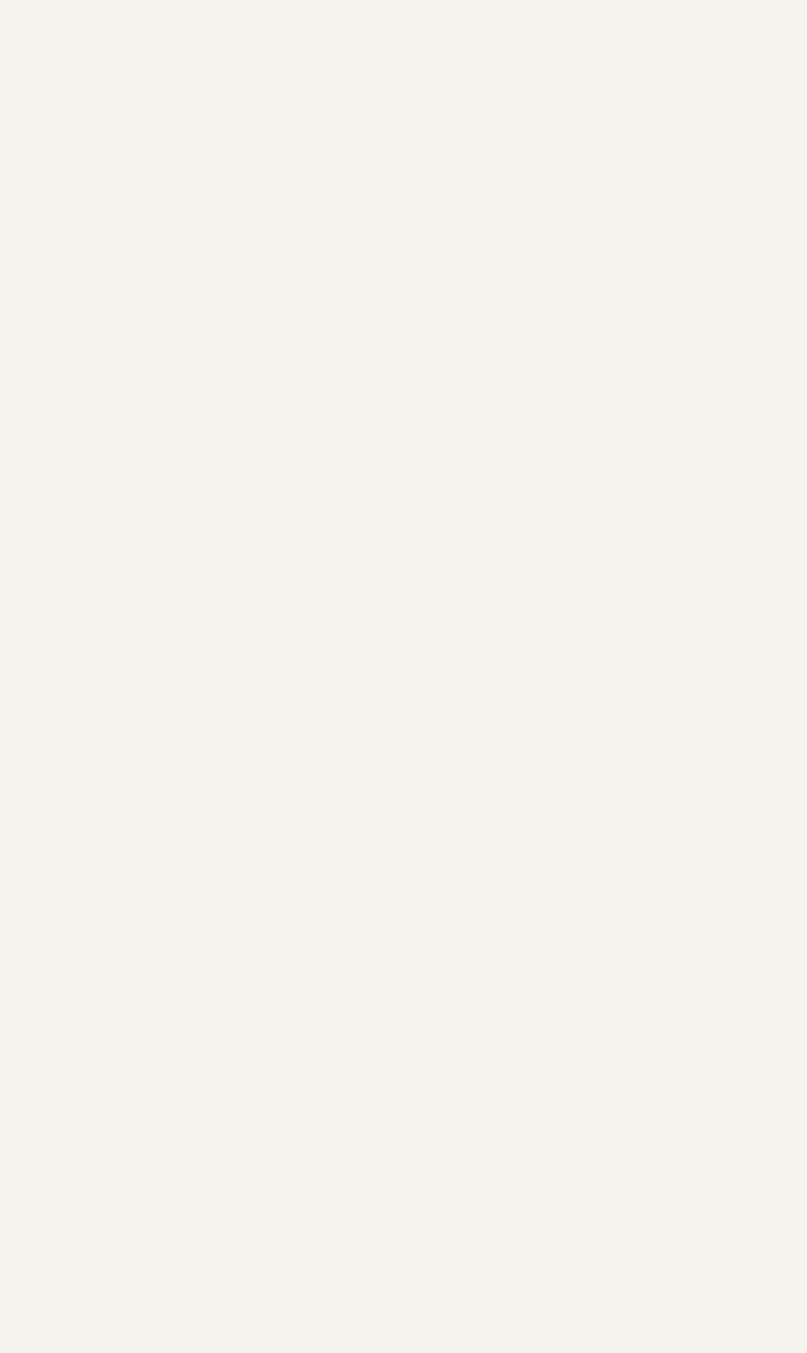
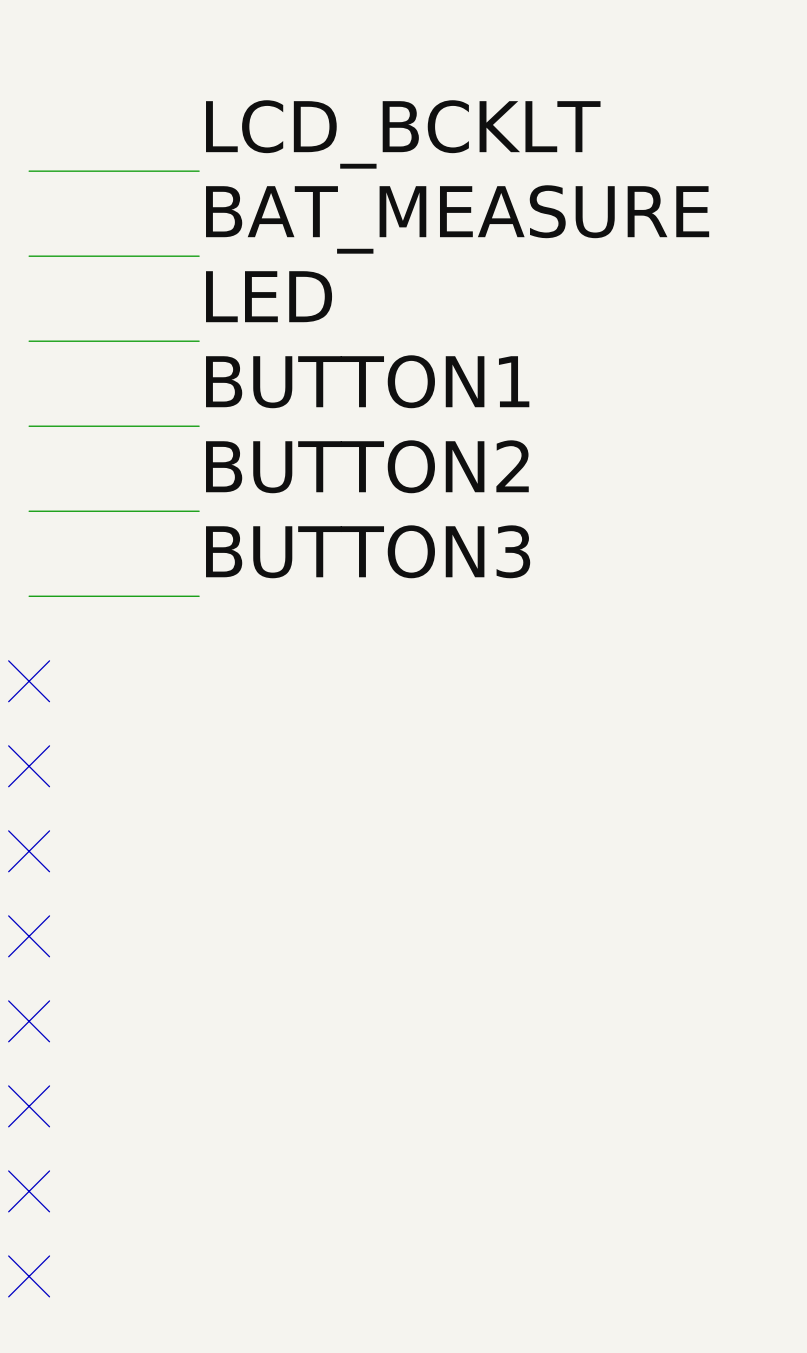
label: none -> LCD_BCKLT (403, 134)
wire: none -> (29, 171) (199, 171)
label: none -> BAT_MEASURE (457, 219)
wire: none -> (29, 256) (199, 256)
label: none -> LED (269, 296)
wire: none -> (29, 341) (199, 341)
label: none -> BUTTON1 (367, 381)
wire: none -> (29, 426) (199, 426)
label: none -> BUTTON2 (367, 466)
wire: none -> (29, 511) (199, 511)
label: none -> BUTTON3 (368, 551)
wire: none -> (29, 596) (199, 596)
no-connect mark: none -> (29, 681)
no-connect mark: none -> (29, 766)
no-connect mark: none -> (29, 851)
no-connect mark: none -> (29, 936)
no-connect mark: none -> (29, 1021)
no-connect mark: none -> (29, 1106)
no-connect mark: none -> (29, 1191)
no-connect mark: none -> (29, 1276)

